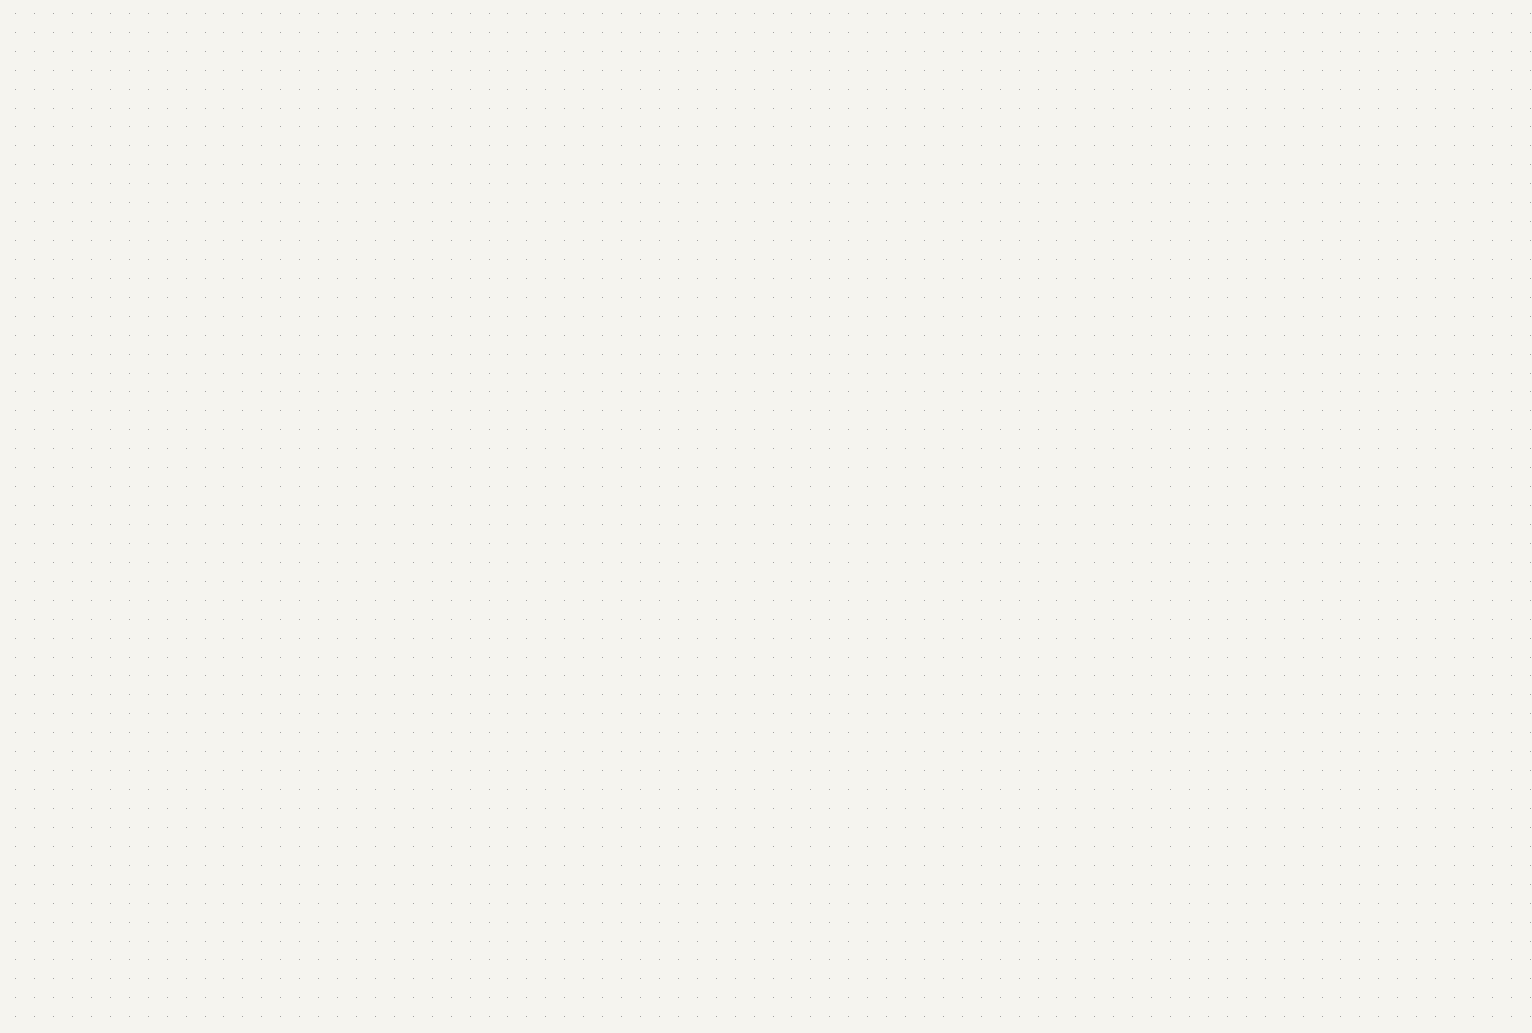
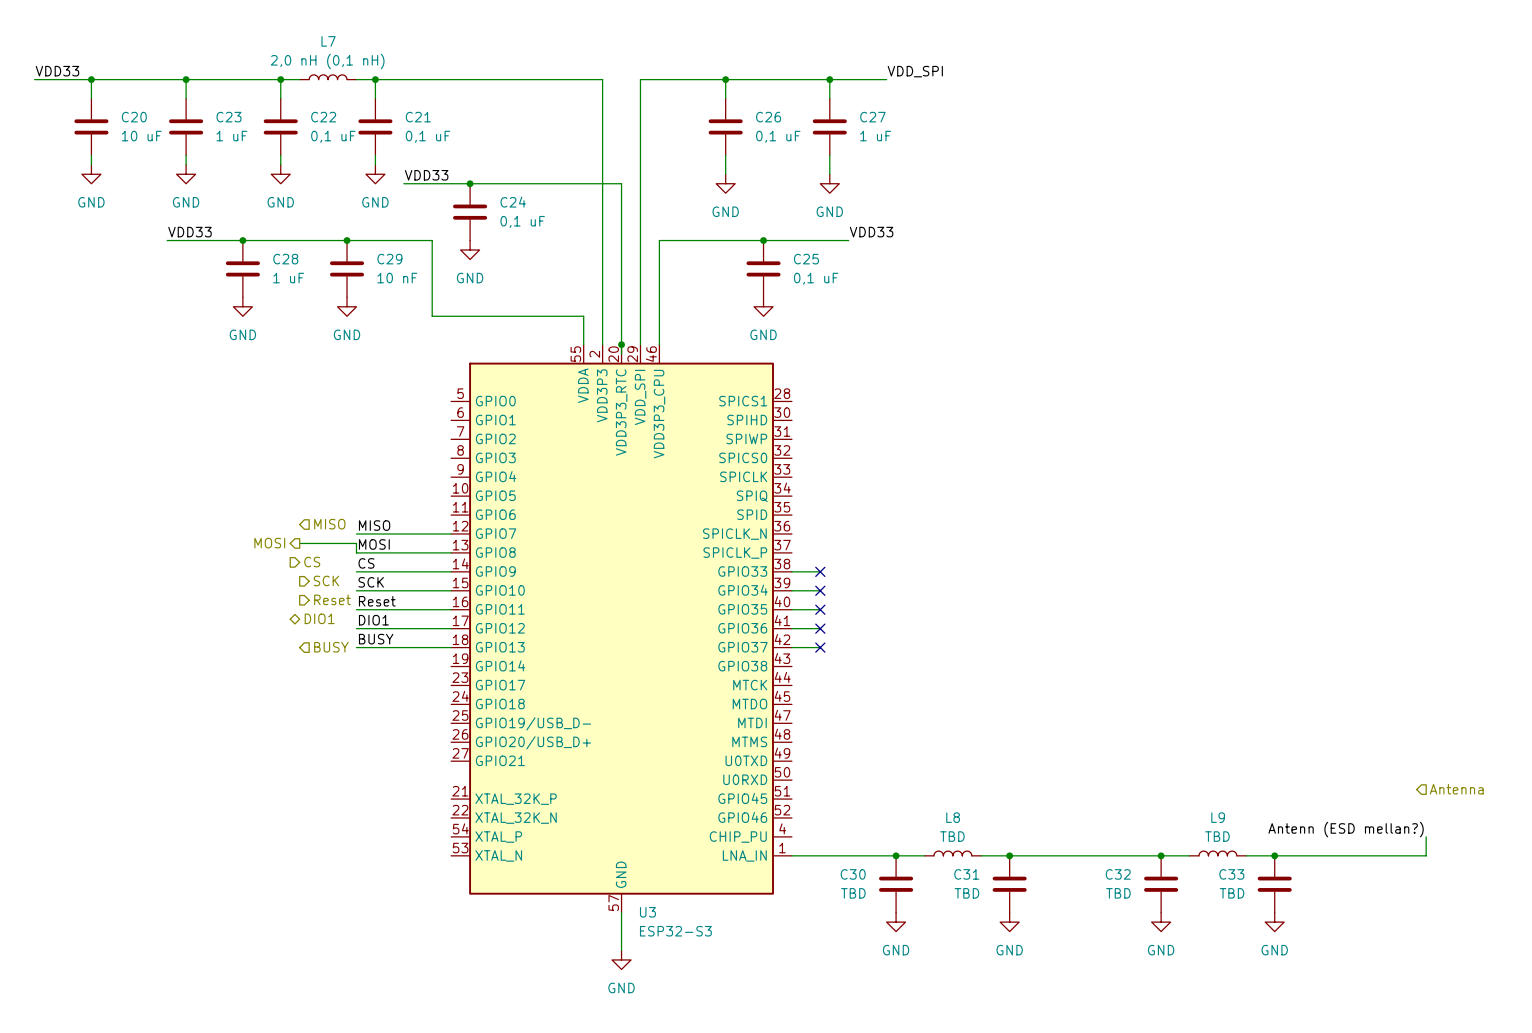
label: none -> VDD33 (57, 71)
label: none -> VDD_SPI (915, 71)
L7: none -> 2,0 nH (0,1 nH) (328, 77)
wire: none -> (34, 79) (299, 79)
wire: none -> (91, 79) (91, 98)
junction: none -> (91, 79)
wire: none -> (186, 79) (186, 98)
junction: none -> (186, 79)
wire: none -> (280, 79) (280, 98)
junction: none -> (280, 79)
wire: none -> (356, 79) (602, 79) (602, 344)
wire: none -> (375, 79) (375, 98)
junction: none -> (375, 79)
wire: none -> (725, 79) (725, 98)
junction: none -> (725, 79)
wire: none -> (829, 79) (829, 98)
junction: none -> (829, 79)
wire: none -> (886, 79) (640, 79) (640, 344)
C20: none -> 10 uF (91, 126)
C23: none -> 1 uF (186, 126)
C22: none -> 0,1 uF (280, 126)
C21: none -> 0,1 uF (375, 126)
C26: none -> 0,1 uF (725, 126)
C27: none -> 1 uF (829, 126)
wire: none -> (91, 155) (91, 164)
wire: none -> (186, 155) (186, 164)
wire: none -> (280, 155) (280, 164)
wire: none -> (375, 155) (375, 164)
wire: none -> (725, 155) (725, 174)
wire: none -> (829, 155) (829, 174)
power symbol: none -> GND (91, 174)
power symbol: none -> GND (186, 174)
power symbol: none -> GND (280, 174)
power symbol: none -> GND (375, 174)
label: none -> VDD33 (426, 175)
wire: none -> (403, 183) (621, 183) (621, 354)
junction: none -> (470, 183)
power symbol: none -> GND (725, 183)
power symbol: none -> GND (829, 183)
C24: none -> 0,1 uF (470, 212)
label: none -> VDD33 (189, 232)
label: none -> VDD33 (871, 232)
wire: none -> (167, 240) (432, 240) (432, 316) (583, 316) (583, 344)
junction: none -> (242, 240)
junction: none -> (347, 240)
junction: none -> (763, 240)
wire: none -> (848, 240) (659, 240) (659, 344)
power symbol: none -> GND (470, 250)
C28: none -> 1 uF (242, 268)
C29: none -> 10 nF (347, 268)
C25: none -> 0,1 uF (763, 268)
power symbol: none -> GND (242, 306)
power symbol: none -> GND (347, 306)
power symbol: none -> GND (763, 306)
junction: none -> (621, 344)
hierarchical label: none -> MISO (329, 524)
label: none -> MISO (374, 525)
wire: none -> (356, 533) (451, 533)
hierarchical label: none -> MOSI (269, 543)
wire: none -> (299, 543) (356, 543) (356, 552) (451, 552)
label: none -> MOSI (374, 544)
hierarchical label: none -> CS (312, 562)
label: none -> CS (366, 563)
wire: none -> (356, 571) (451, 571)
wire: none -> (791, 571) (820, 571)
no-connect mark: none -> (820, 571)
hierarchical label: none -> SCK (326, 580)
label: none -> SCK (371, 582)
wire: none -> (356, 590) (451, 590)
wire: none -> (791, 590) (820, 590)
no-connect mark: none -> (820, 590)
hierarchical label: none -> Reset (332, 599)
label: none -> Reset (377, 601)
wire: none -> (356, 609) (451, 609)
wire: none -> (791, 609) (820, 609)
no-connect mark: none -> (820, 609)
hierarchical label: none -> DIO1 (319, 618)
label: none -> DIO1 (373, 620)
wire: none -> (356, 628) (451, 628)
U3: none -> ESP32-S3 (621, 628)
wire: none -> (791, 628) (820, 628)
no-connect mark: none -> (820, 628)
label: none -> BUSY (376, 639)
hierarchical label: none -> BUSY (331, 647)
wire: none -> (356, 647) (451, 647)
wire: none -> (791, 647) (820, 647)
no-connect mark: none -> (820, 647)
hierarchical label: none -> Antenna (1456, 789)
label: none -> Antenn (ESD mellan?) (1346, 829)
wire: none -> (1426, 836) (1426, 855) (1246, 855)
L8: none -> TBD (952, 853)
L9: none -> TBD (1217, 853)
wire: none -> (791, 855) (924, 855)
junction: none -> (896, 855)
wire: none -> (981, 855) (1189, 855)
junction: none -> (1009, 855)
junction: none -> (1161, 855)
junction: none -> (1274, 855)
C30: none -> TBD (896, 884)
C31: none -> TBD (1009, 884)
C32: none -> TBD (1161, 884)
C33: none -> TBD (1274, 884)
wire: none -> (621, 912) (621, 950)
power symbol: none -> GND (896, 922)
power symbol: none -> GND (1009, 922)
power symbol: none -> GND (1161, 922)
power symbol: none -> GND (1274, 922)
power symbol: none -> GND (621, 959)

